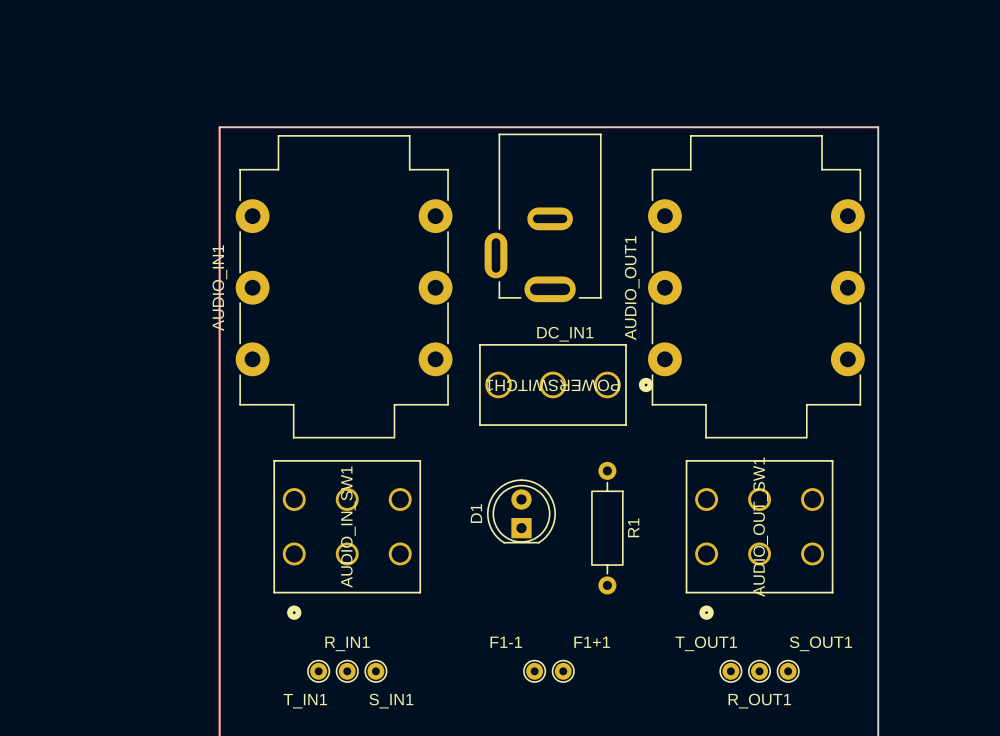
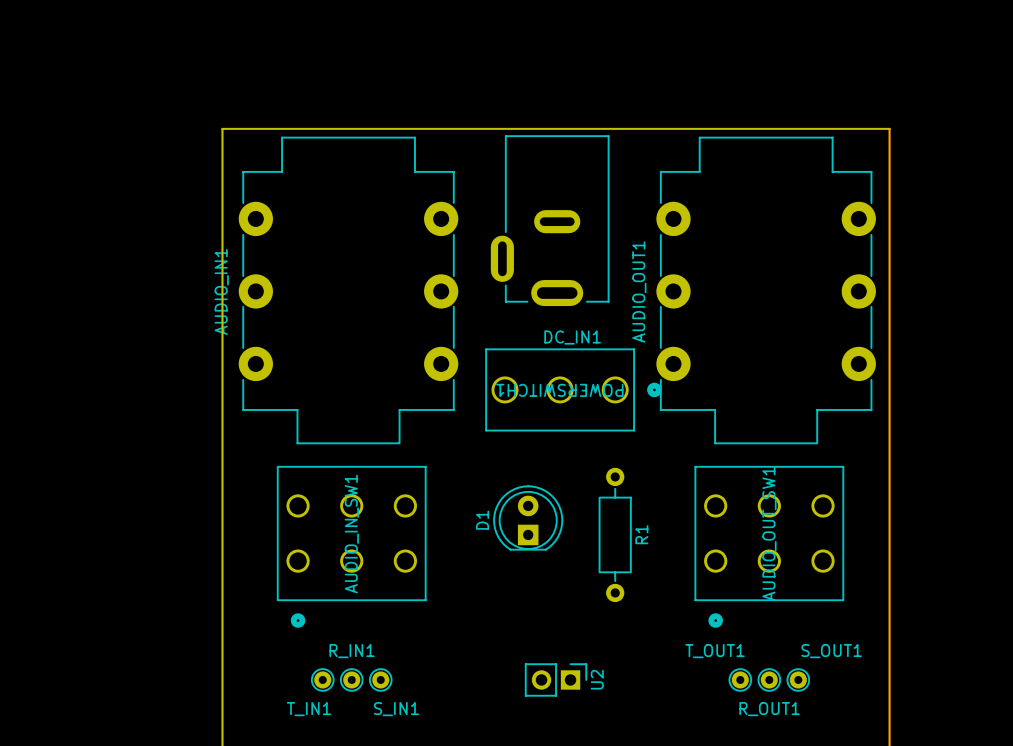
F1-1: (534, 671) -> none
U2: none -> (556, 679)
F1+1: (563, 671) -> none

